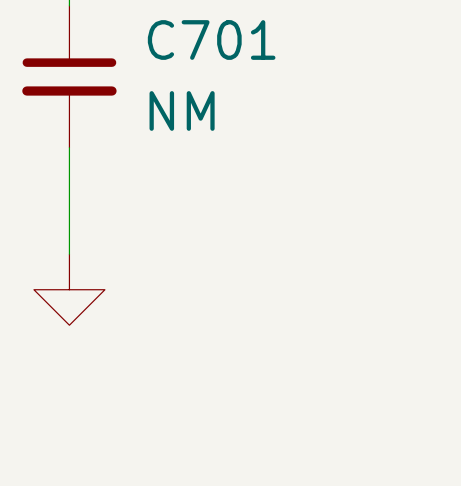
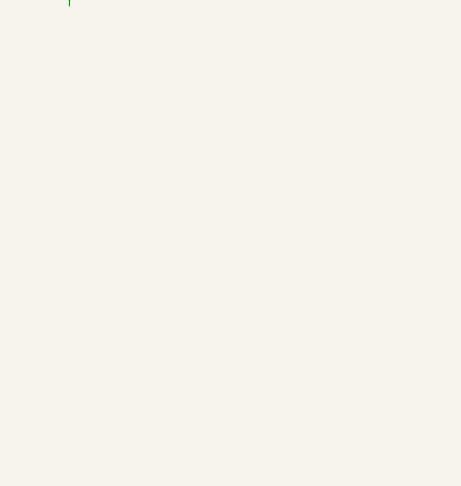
C701: NM (69, 76) -> none
wire: (69, 147) (69, 254) -> none
power symbol: (69, 289) -> none

